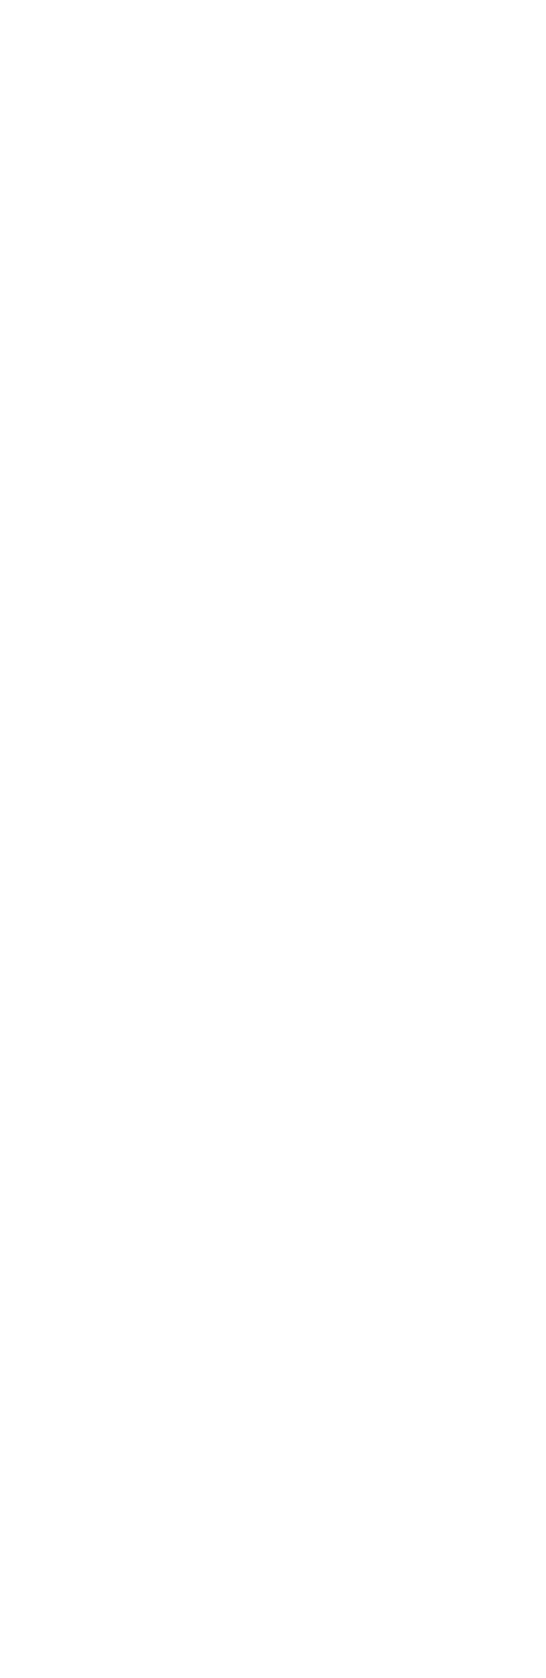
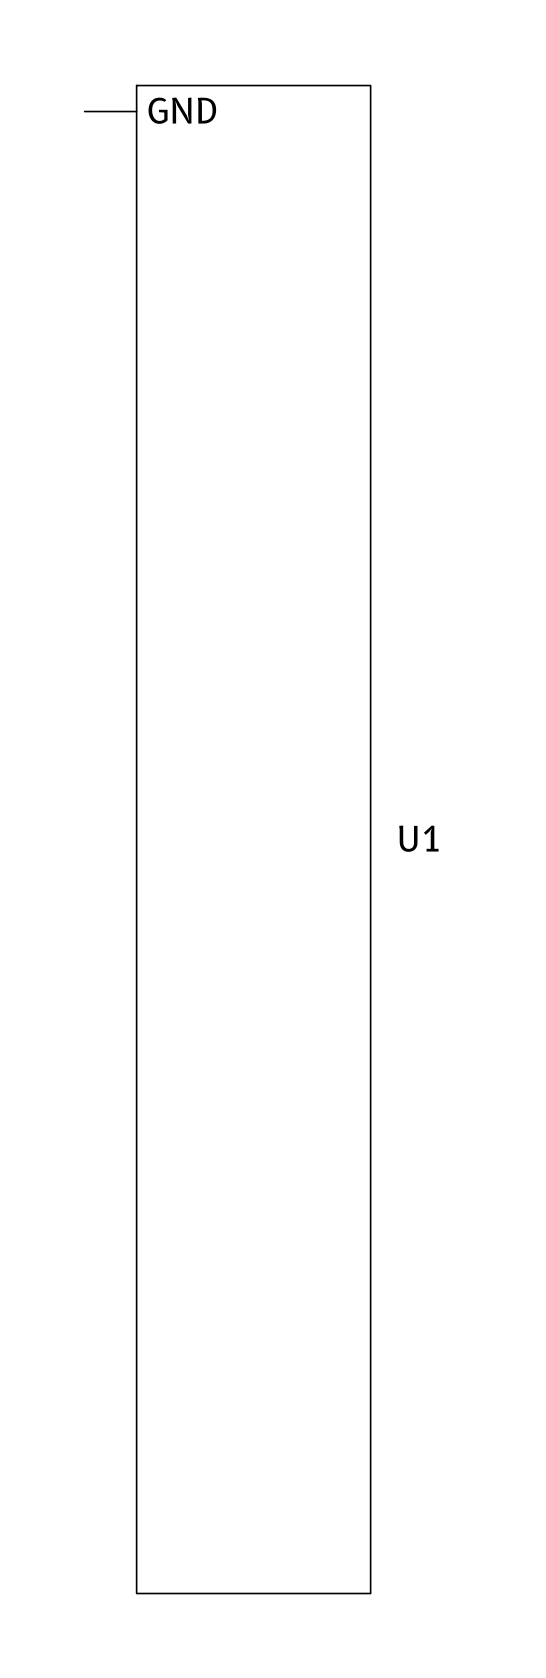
U1: none -> (227, 839)

